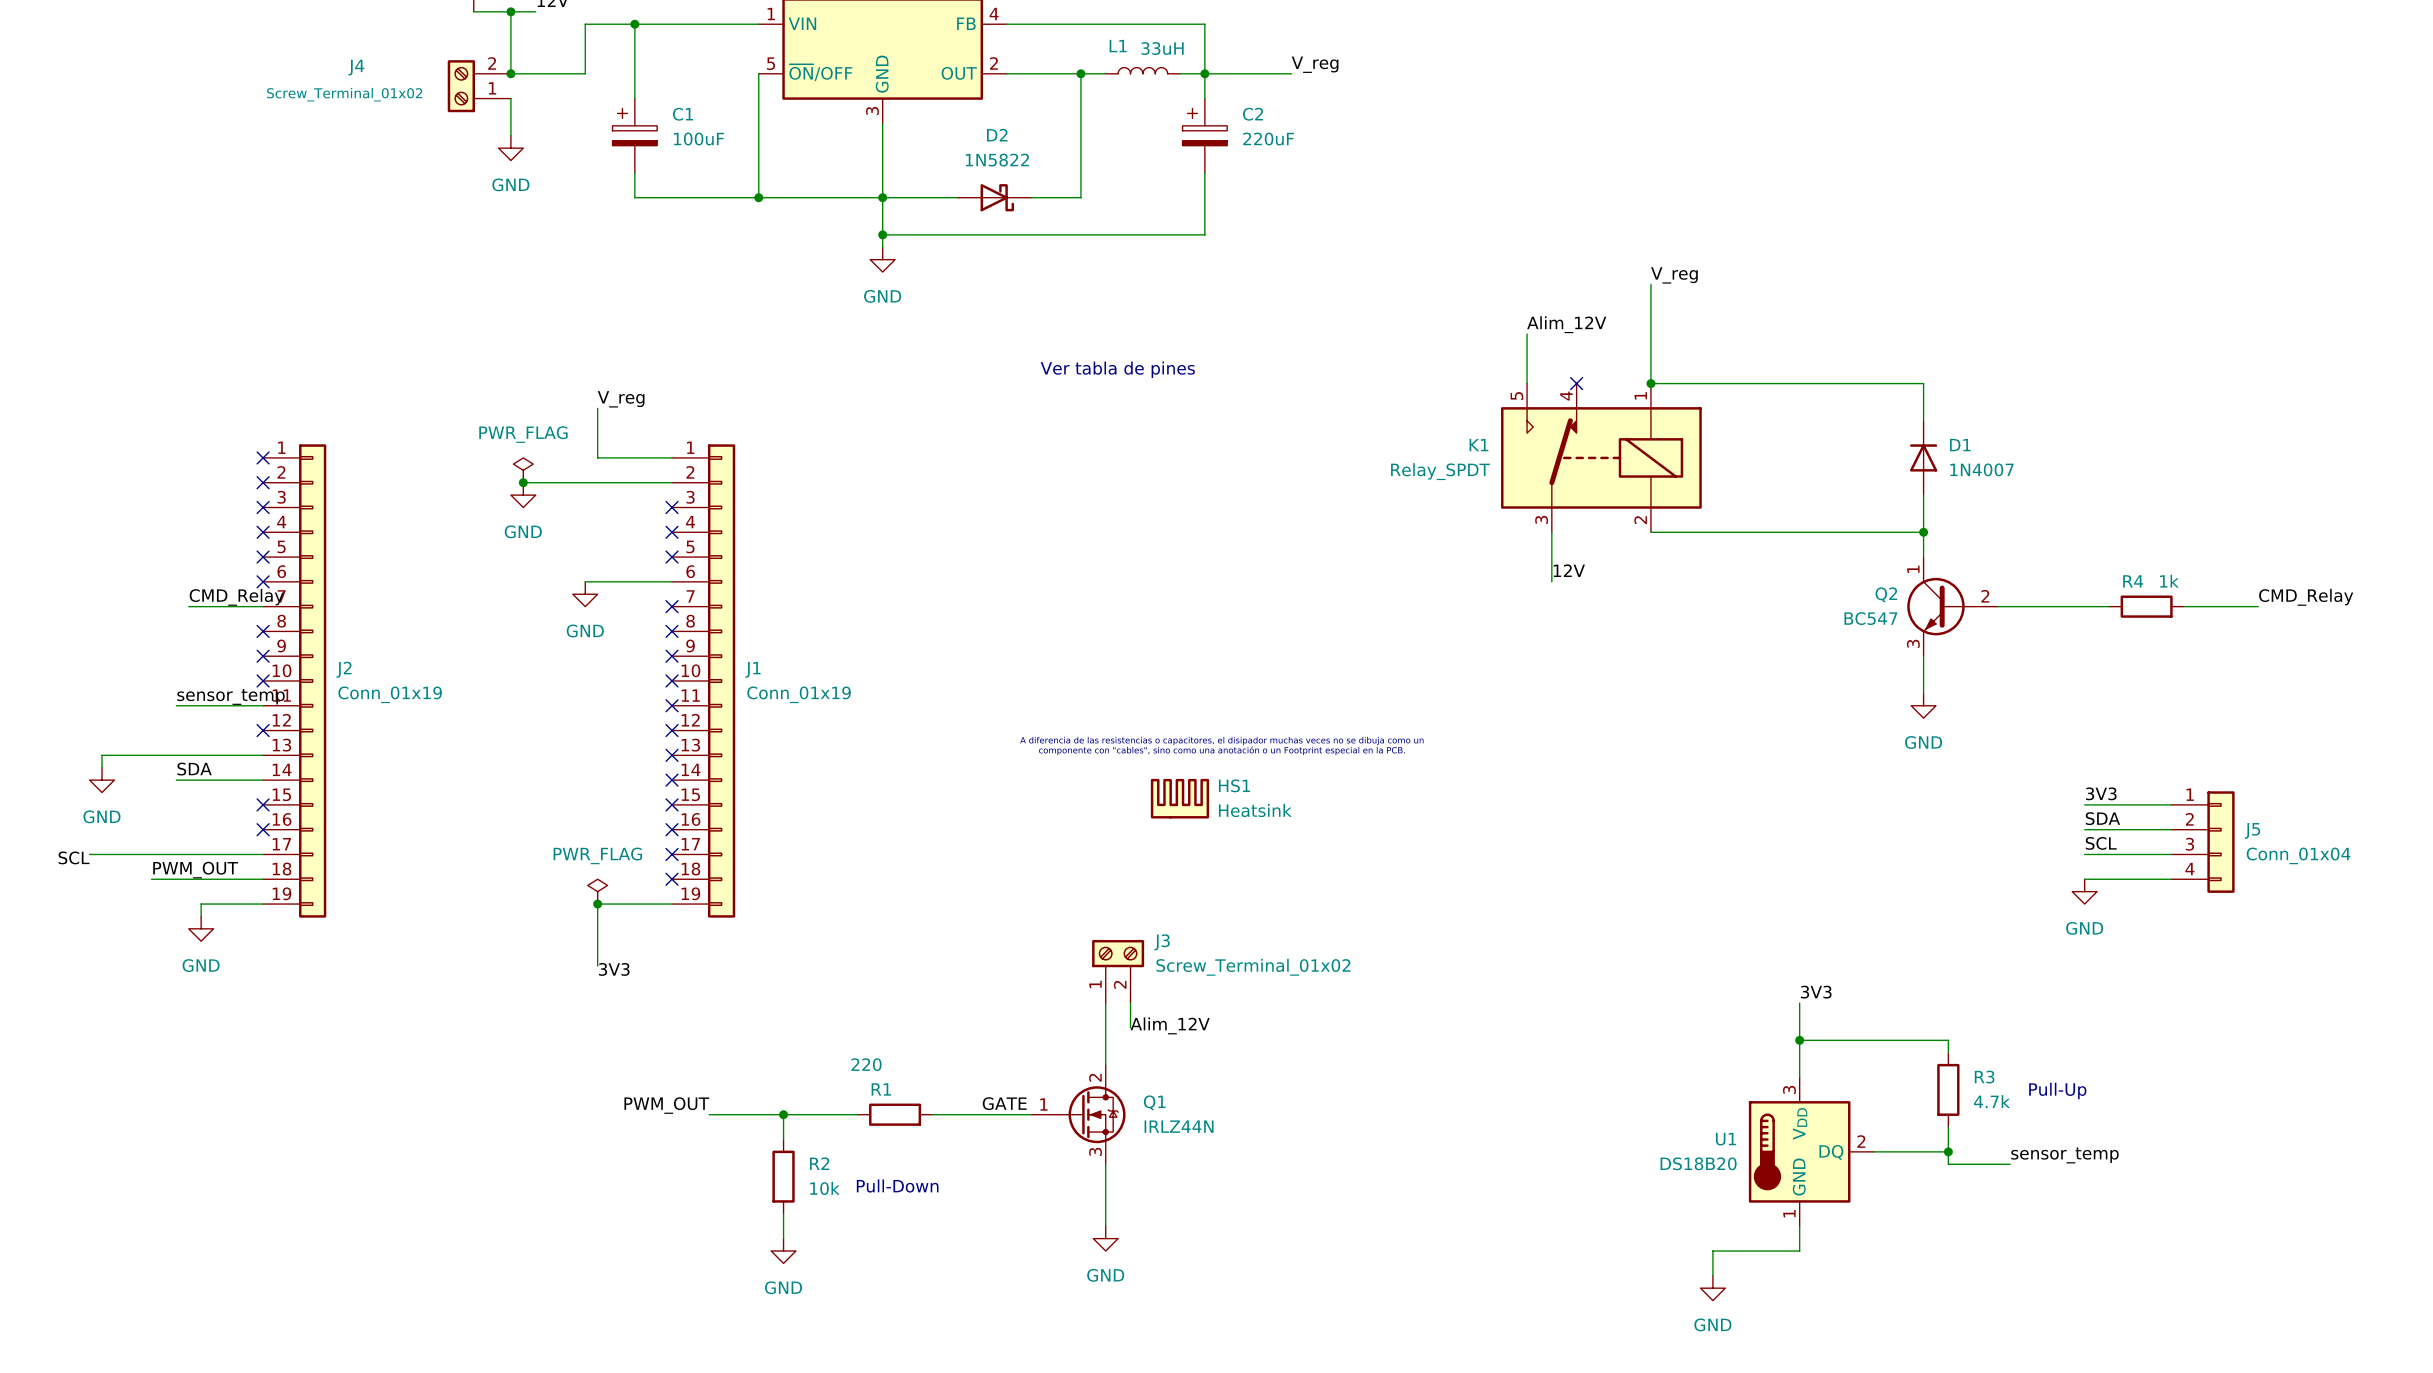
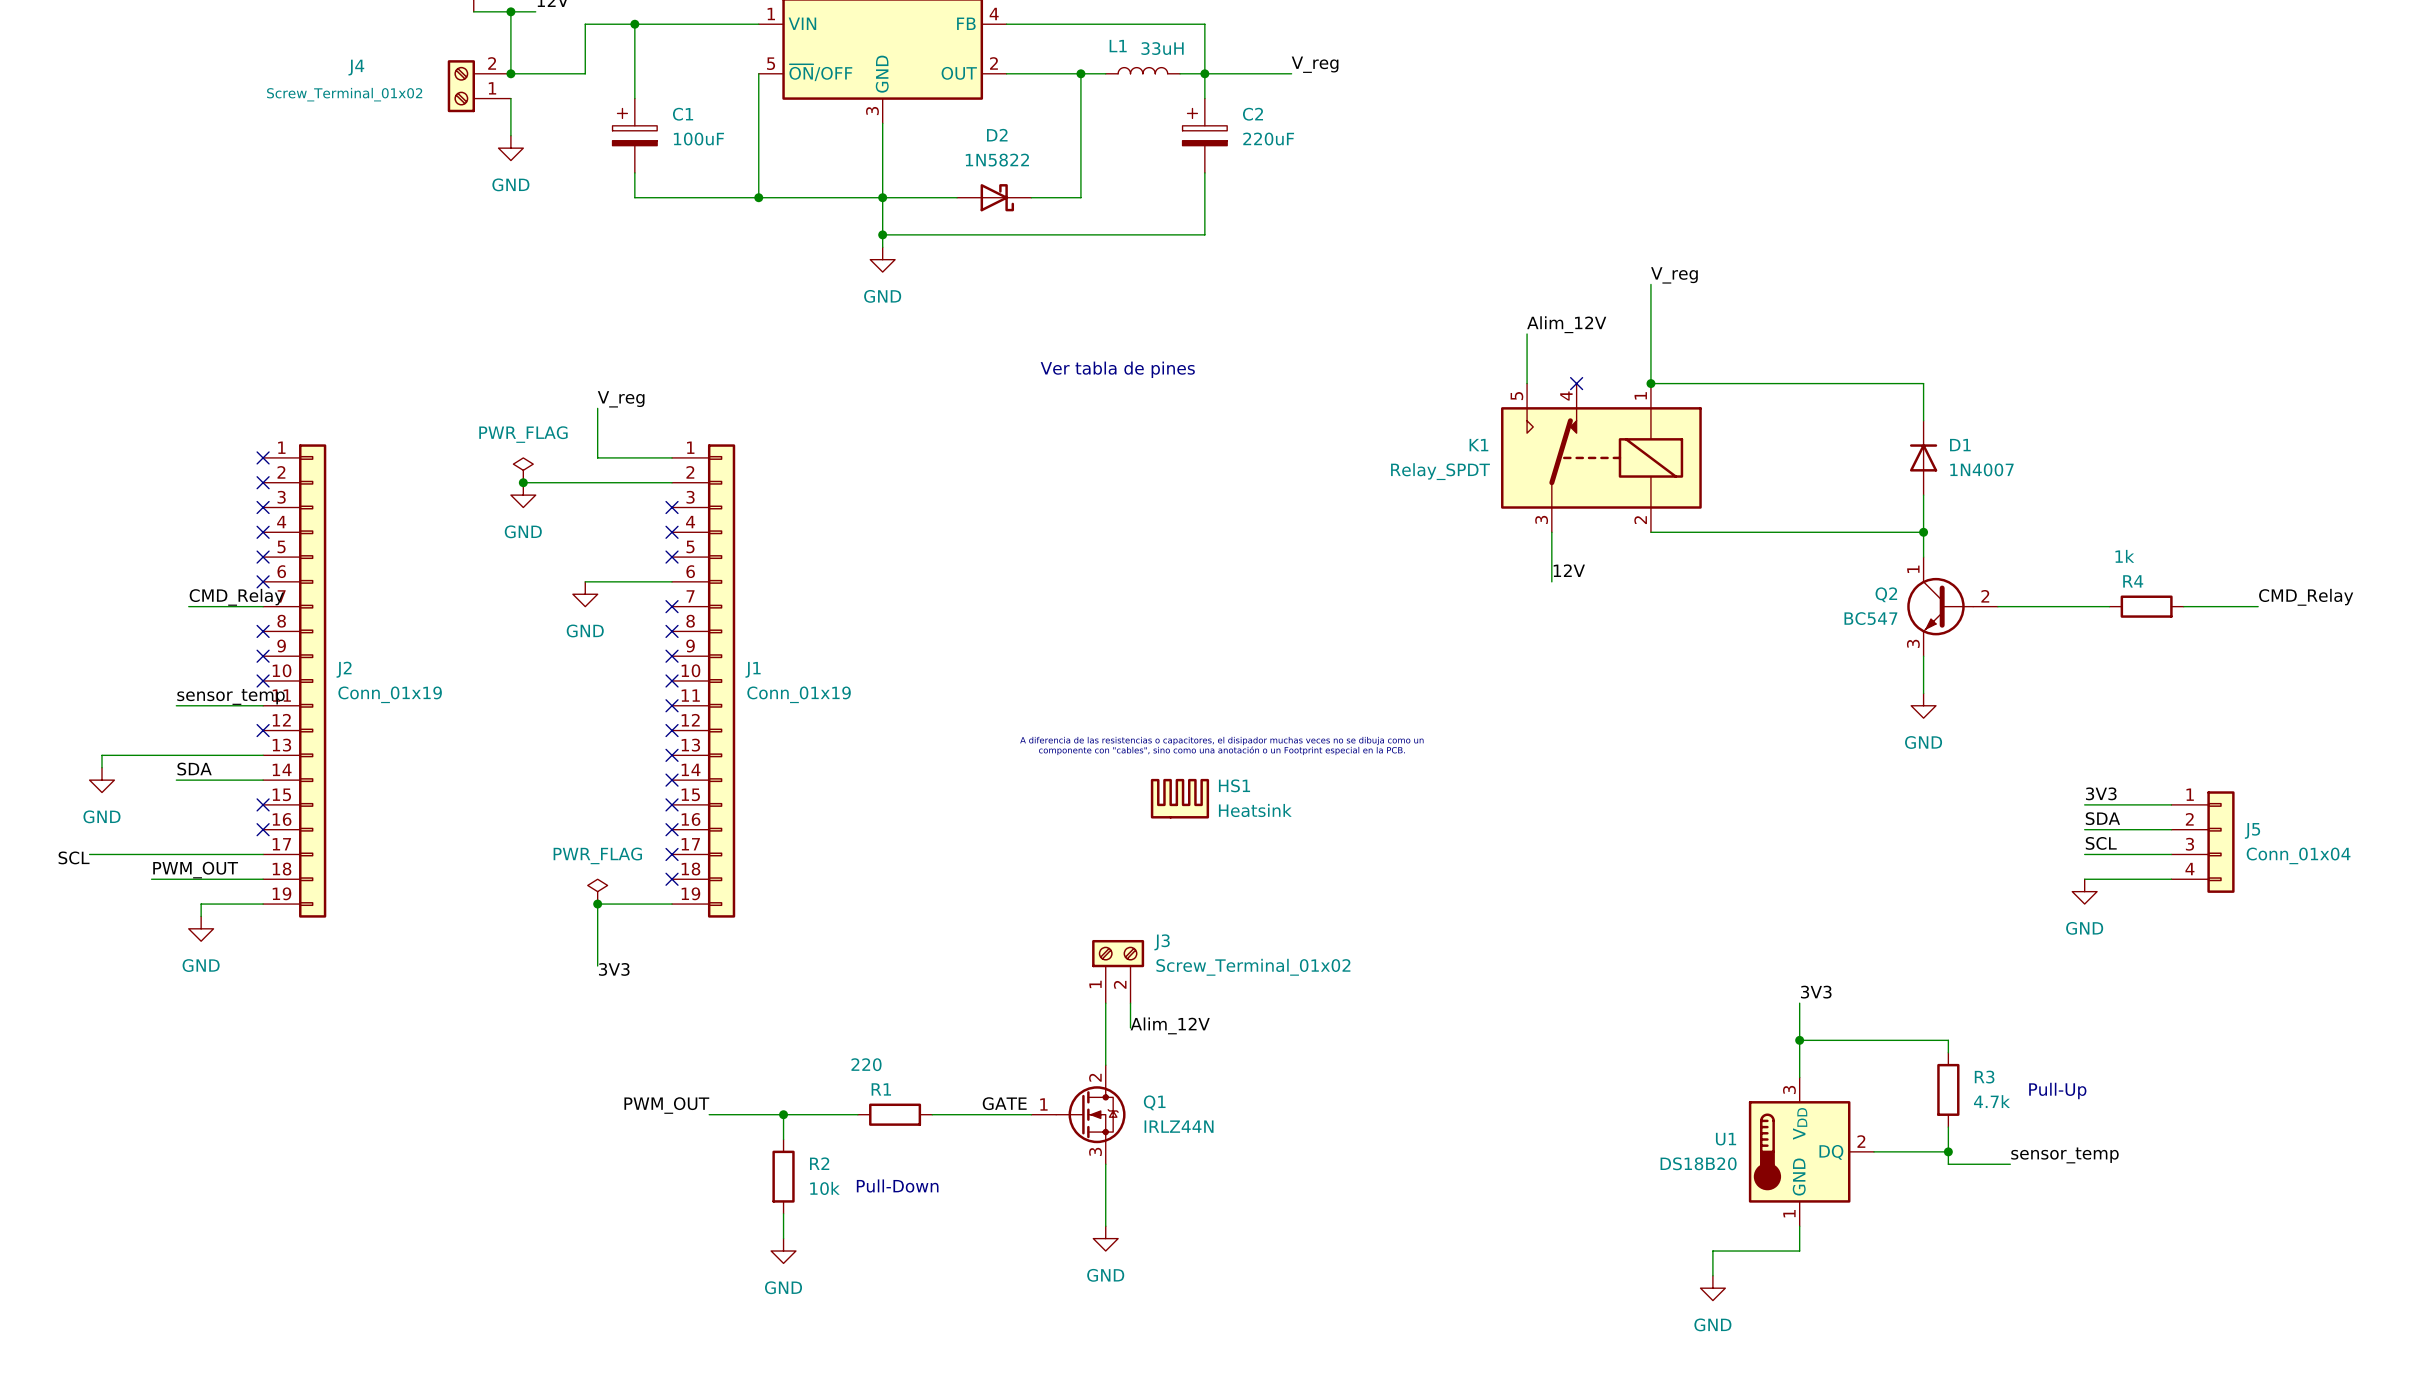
R4 value position: 1k (2169, 581) -> 1k (2124, 556)

